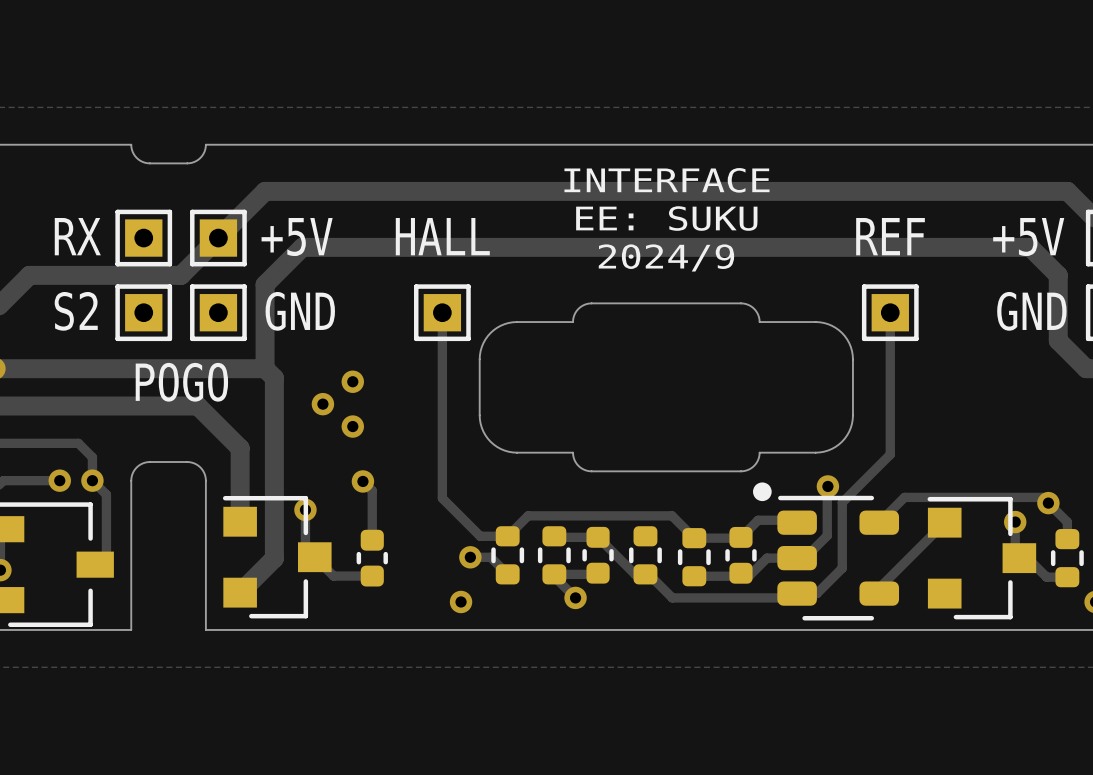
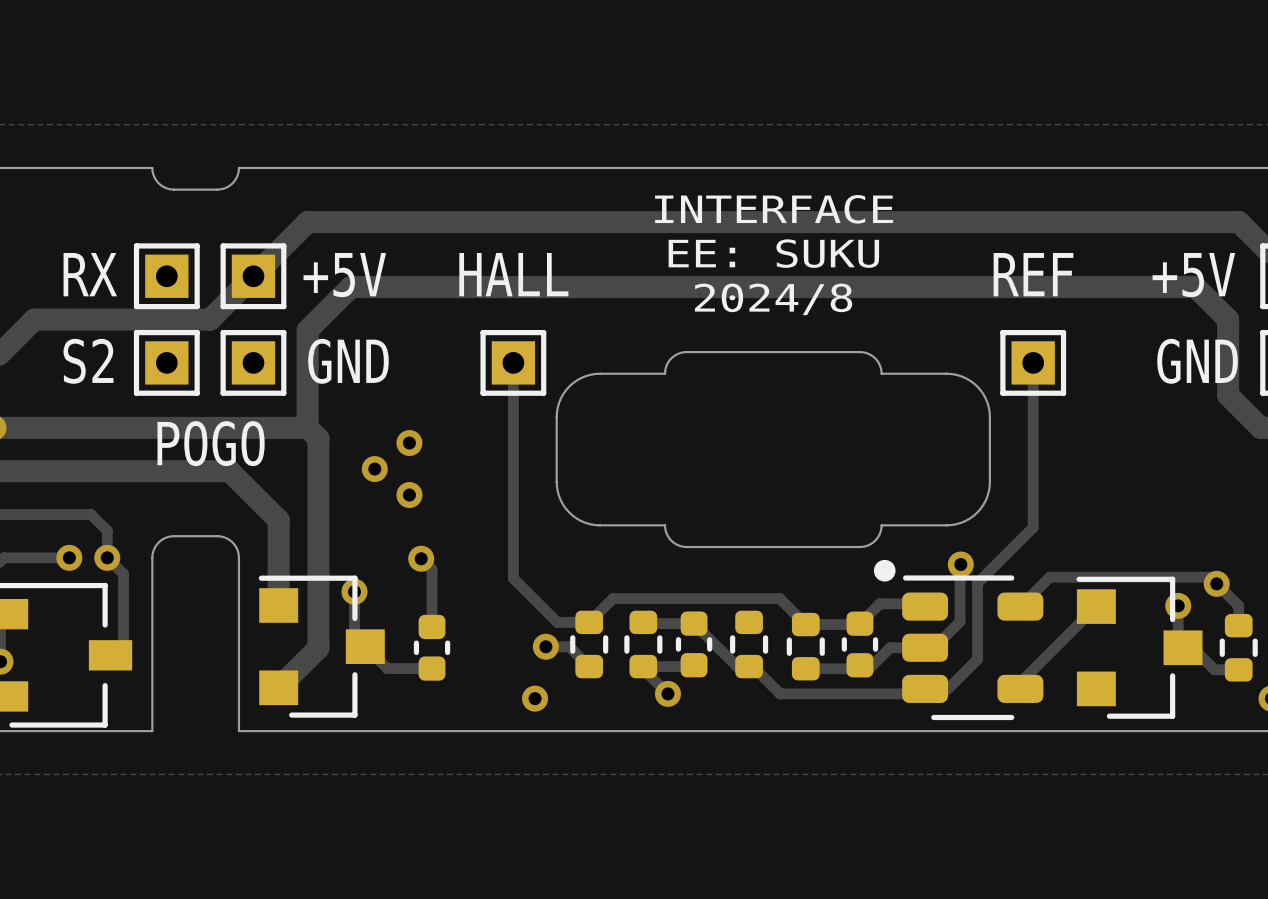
text: 2024/9 (666, 257) -> 2024/8 (773, 299)

